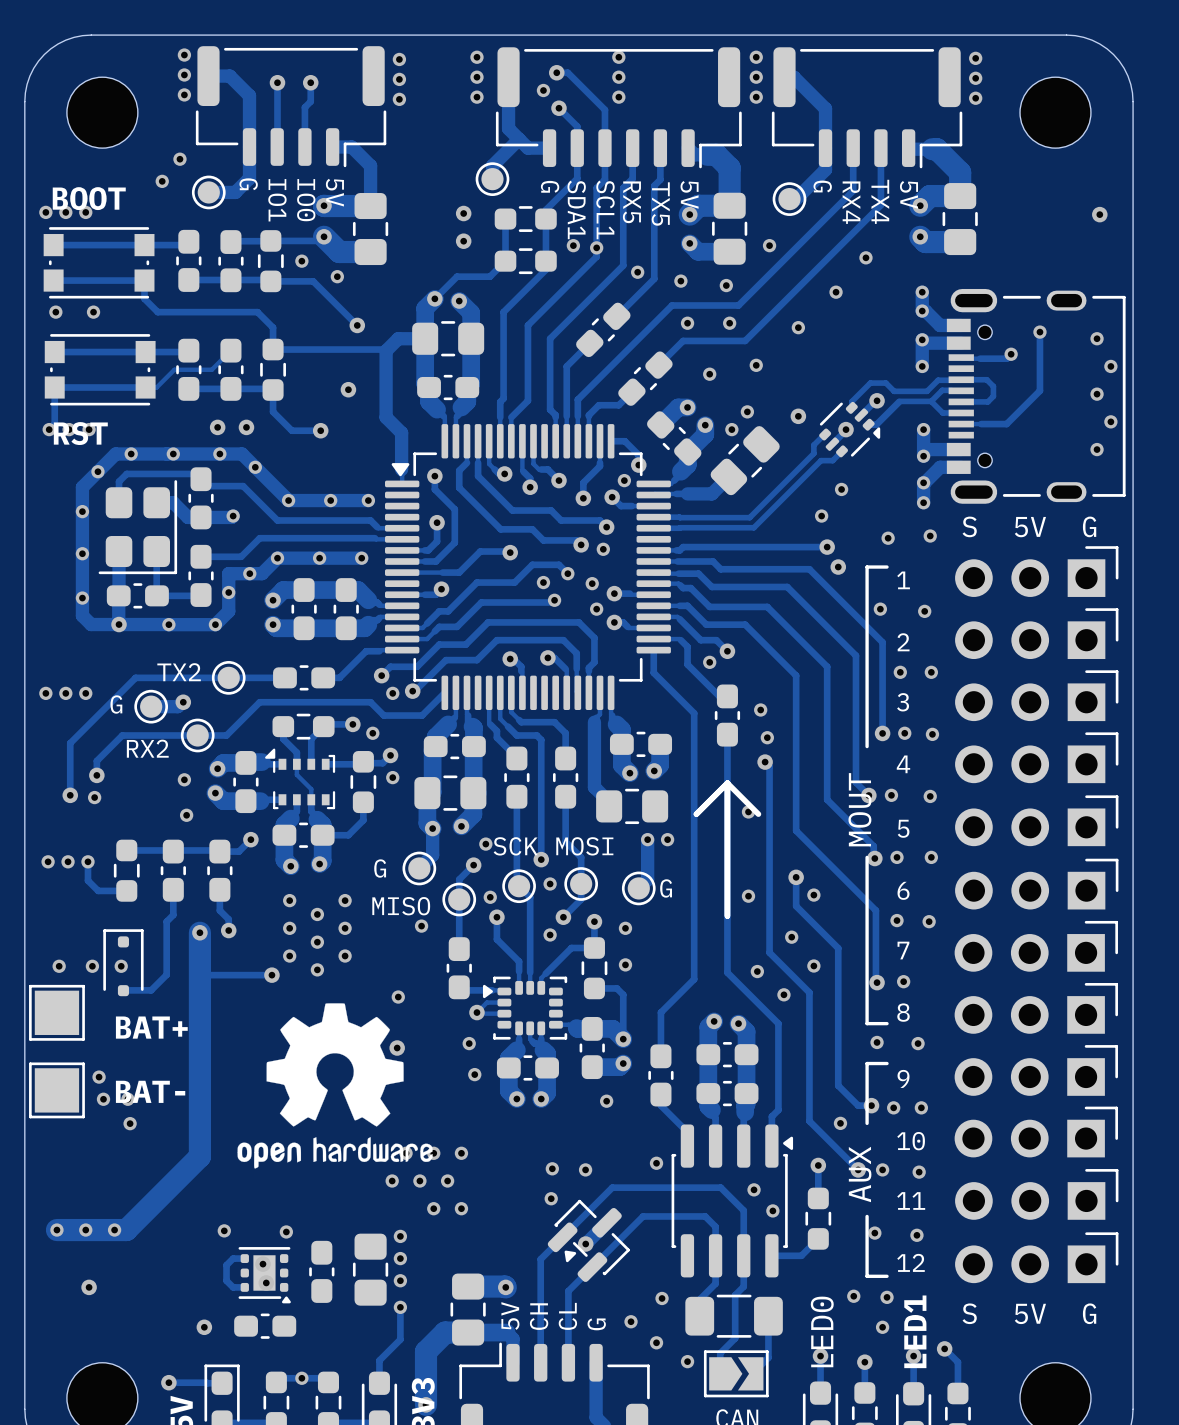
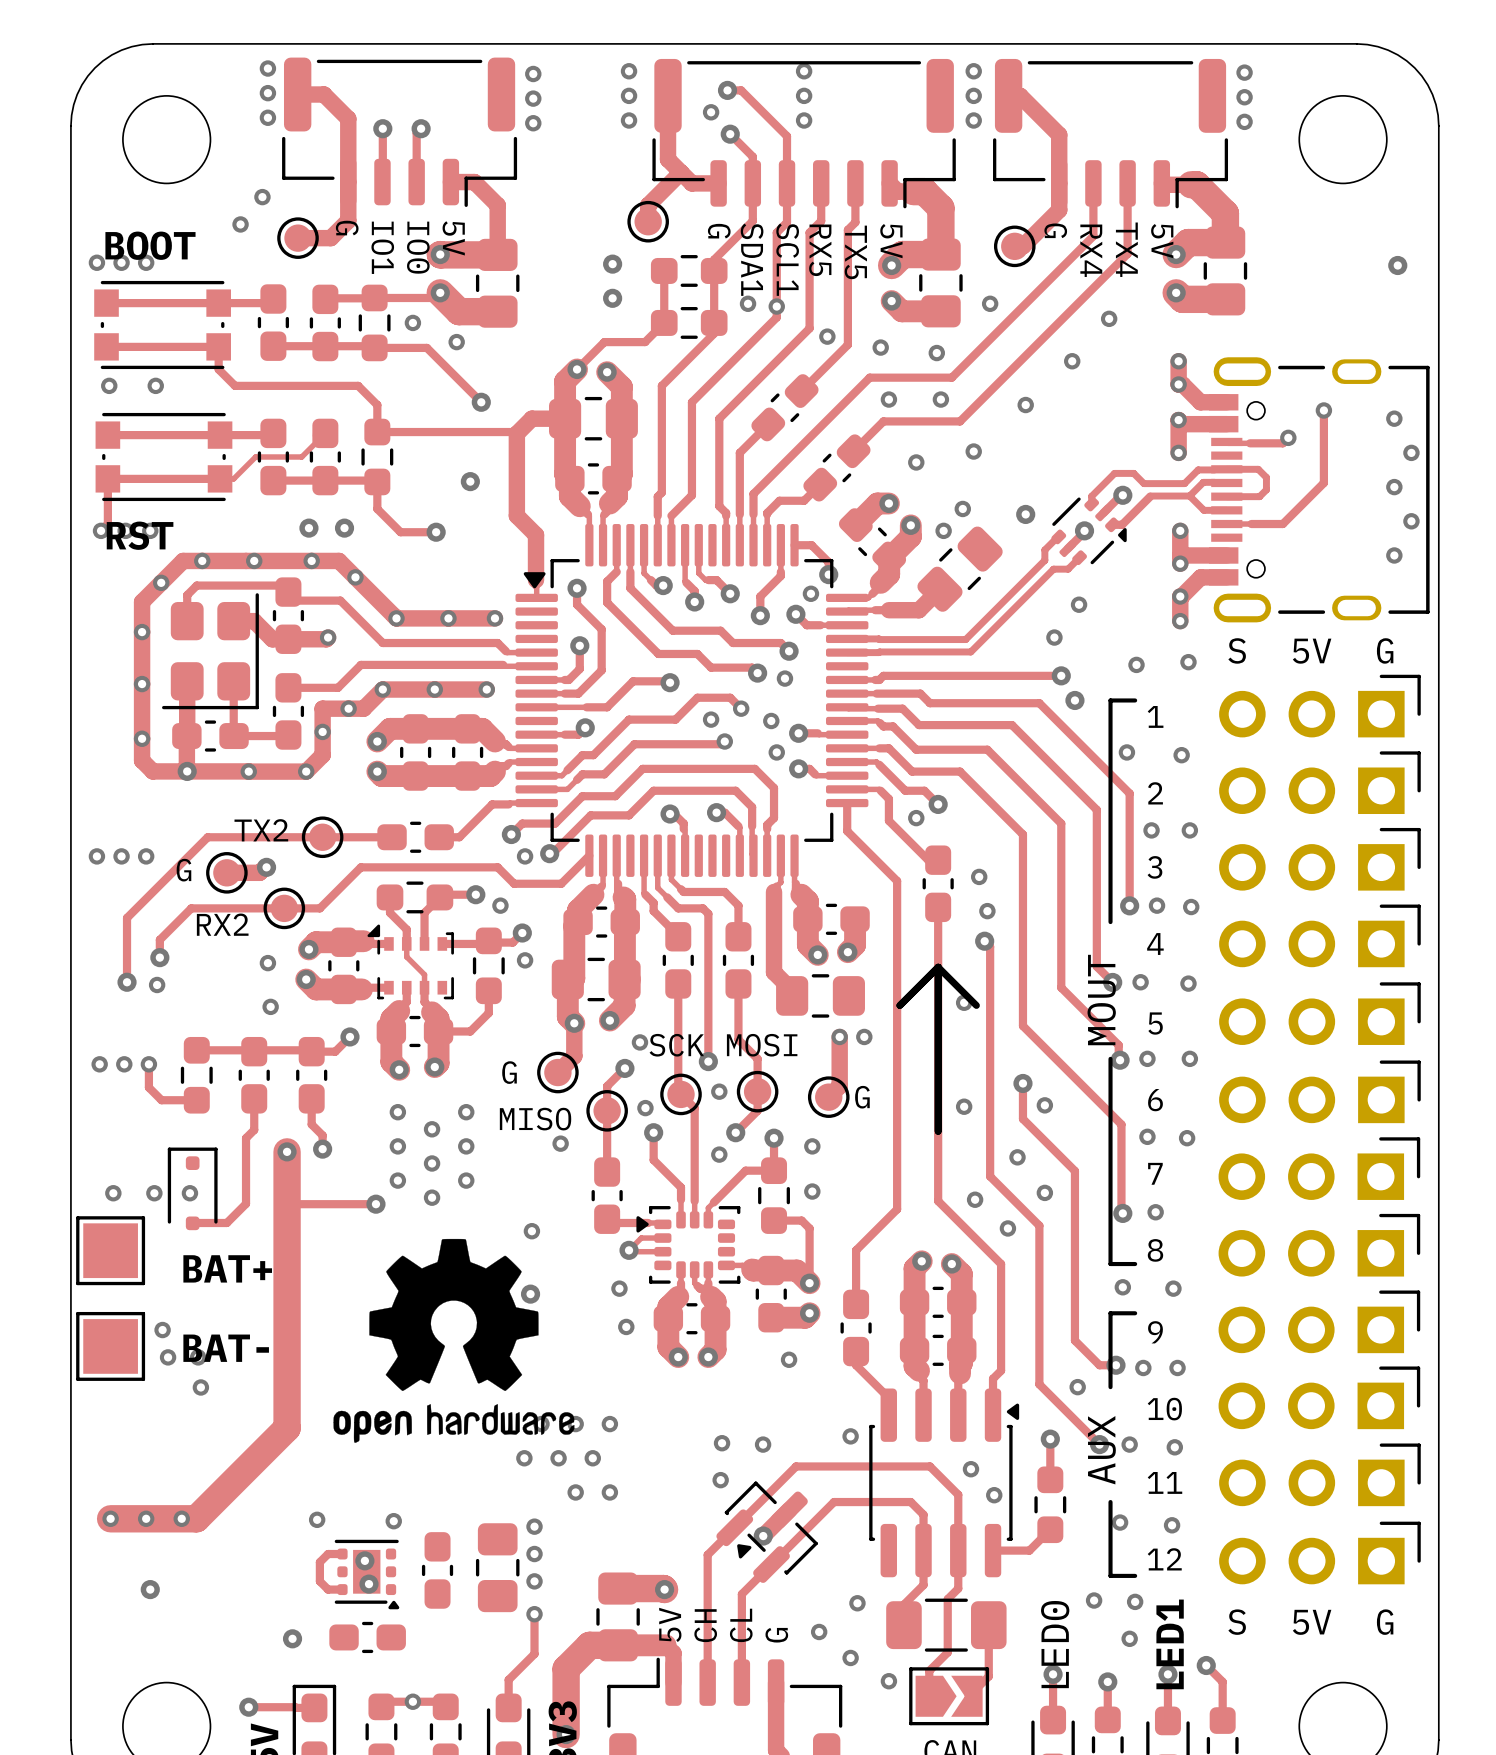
track: (277, 82) (277, 103) -> none
via: (277, 82) -> none
track: (310, 82) (310, 101) (308, 103) -> none
via: (310, 82) -> none
via: none -> (382, 128)
via: none -> (421, 128)

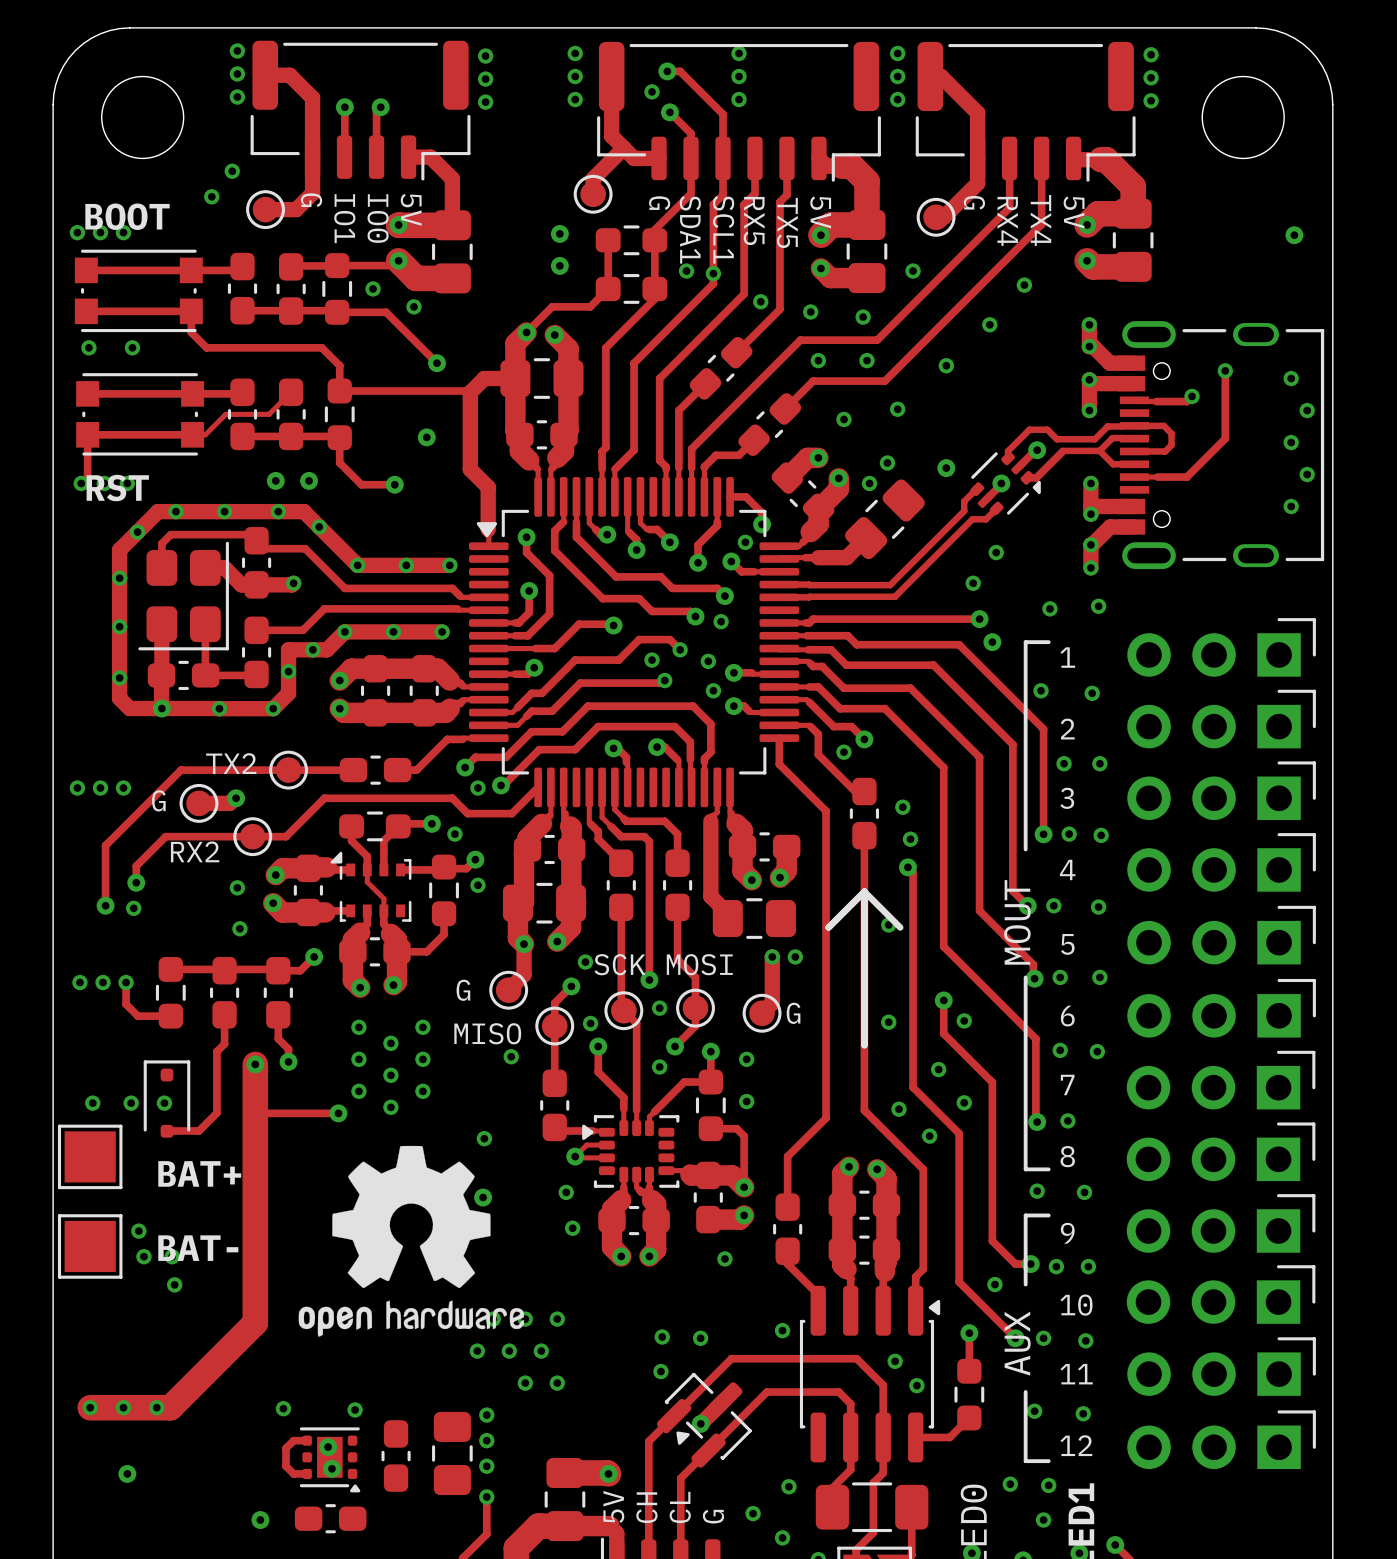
text: S 5V G (1310, 650) -> none
text: S 5V G (1310, 1622) -> none

